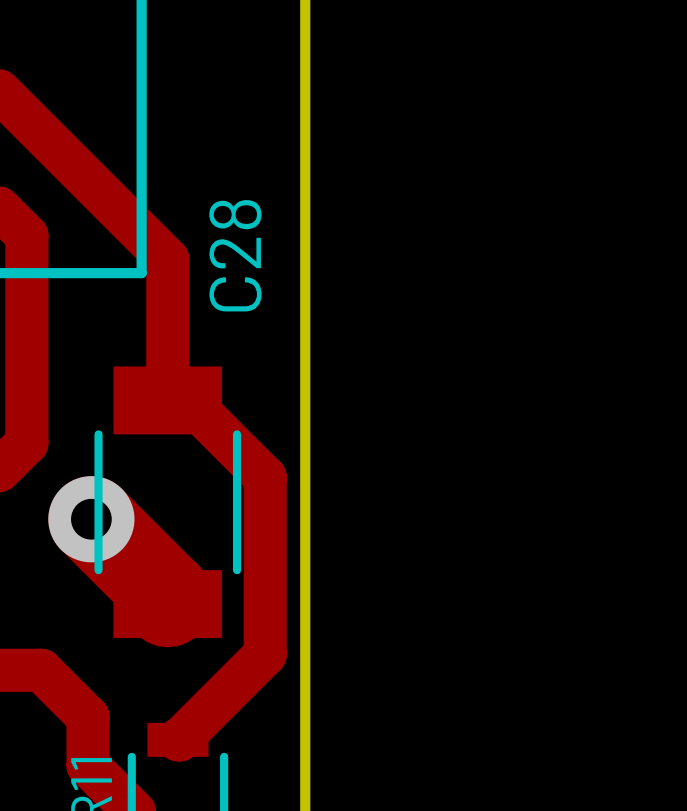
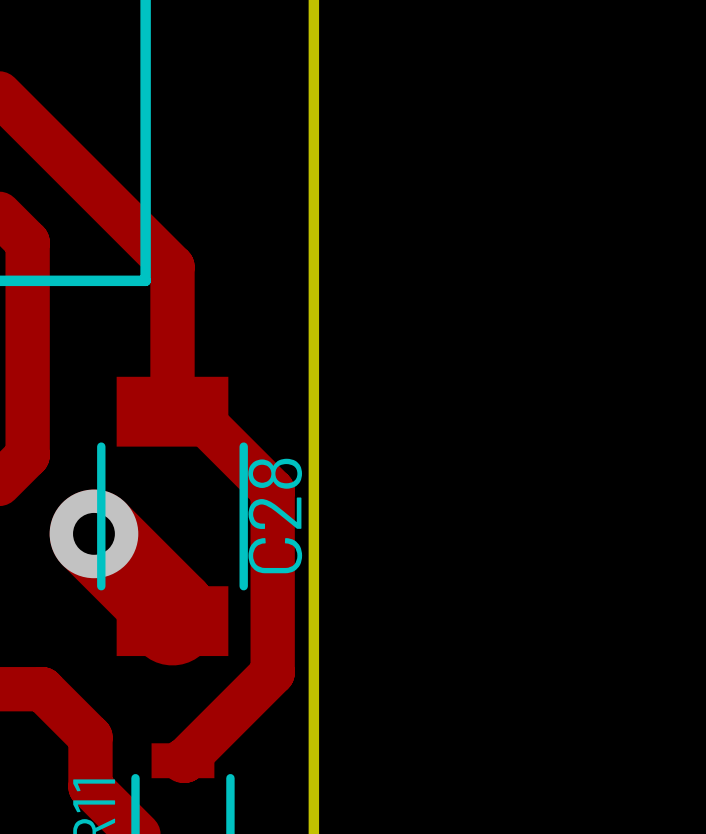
C28 name position: C28 (235, 255) -> C28 (275, 516)

